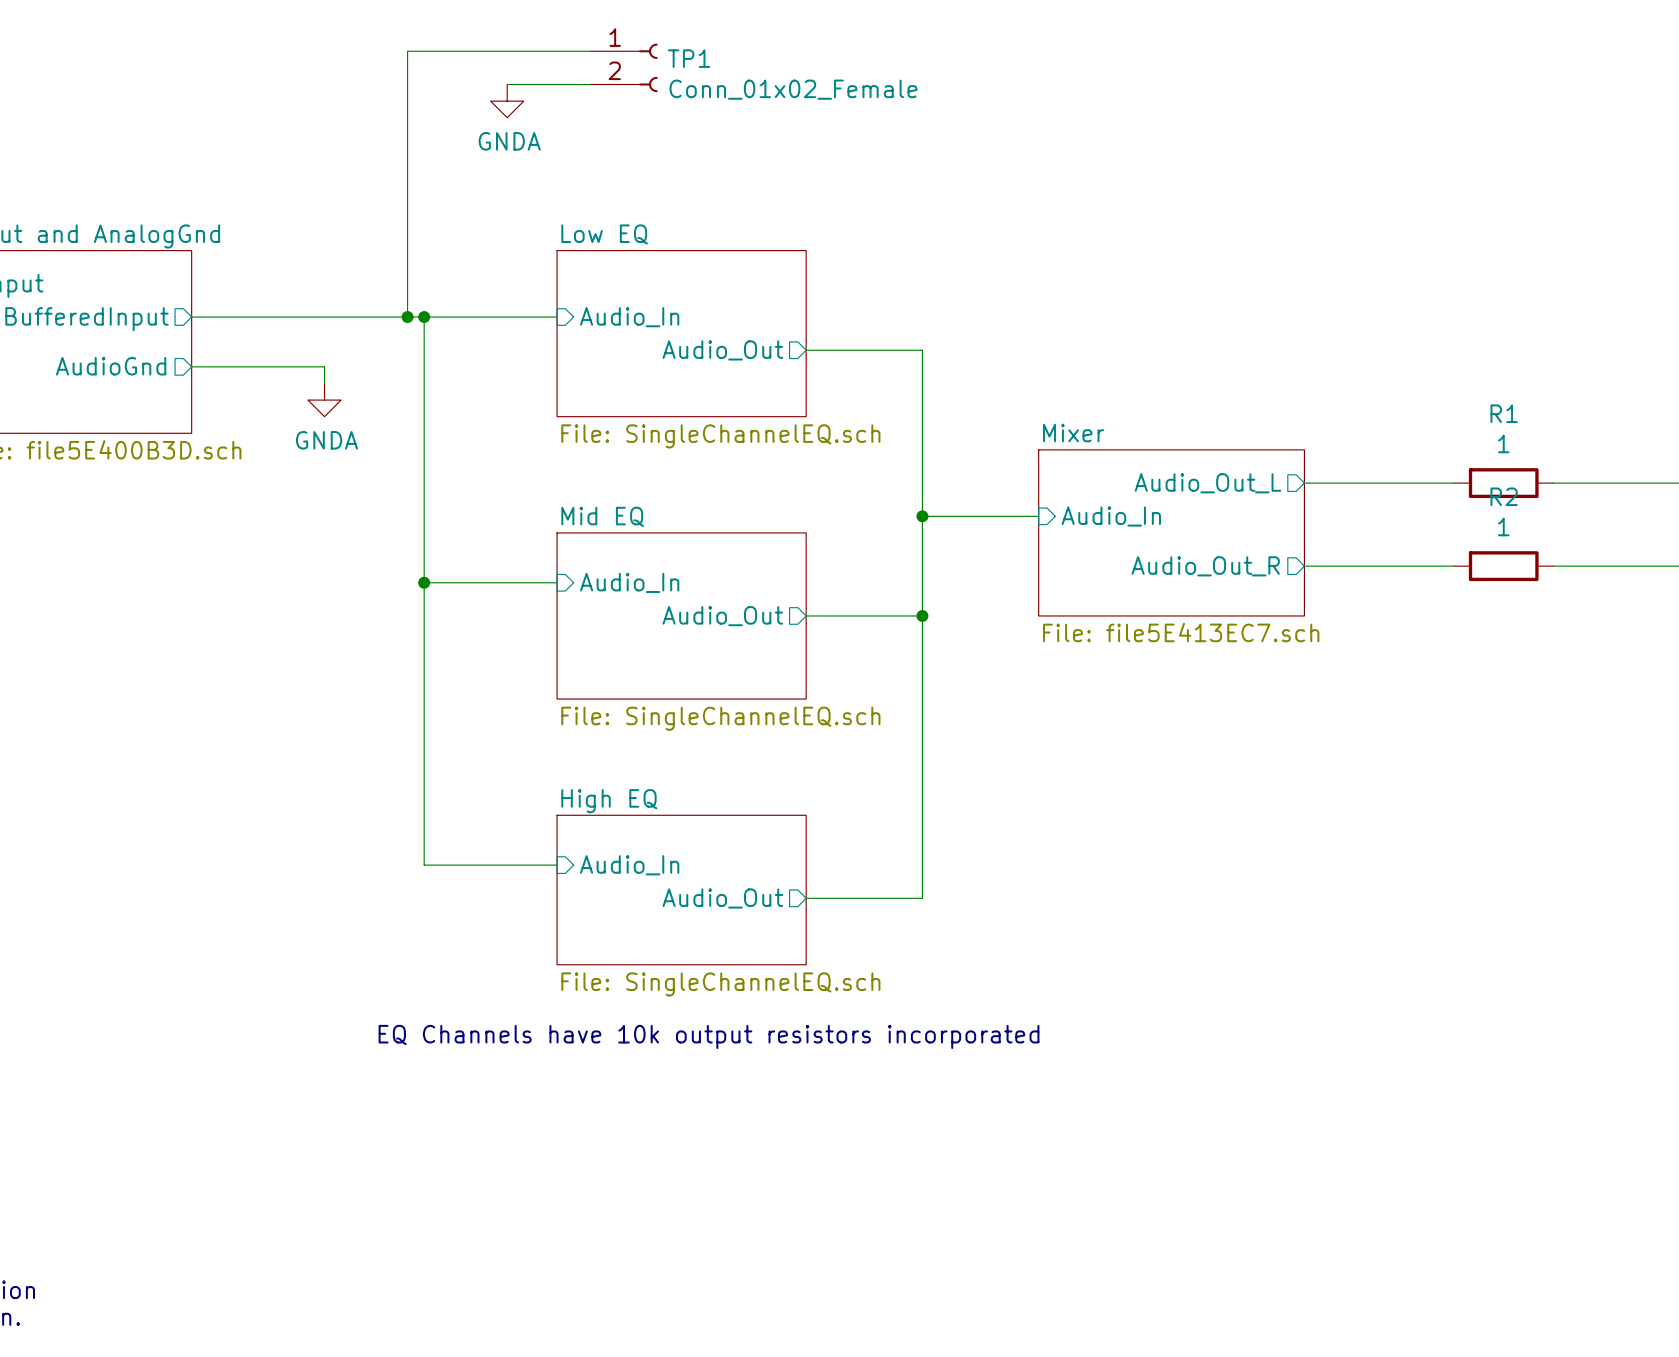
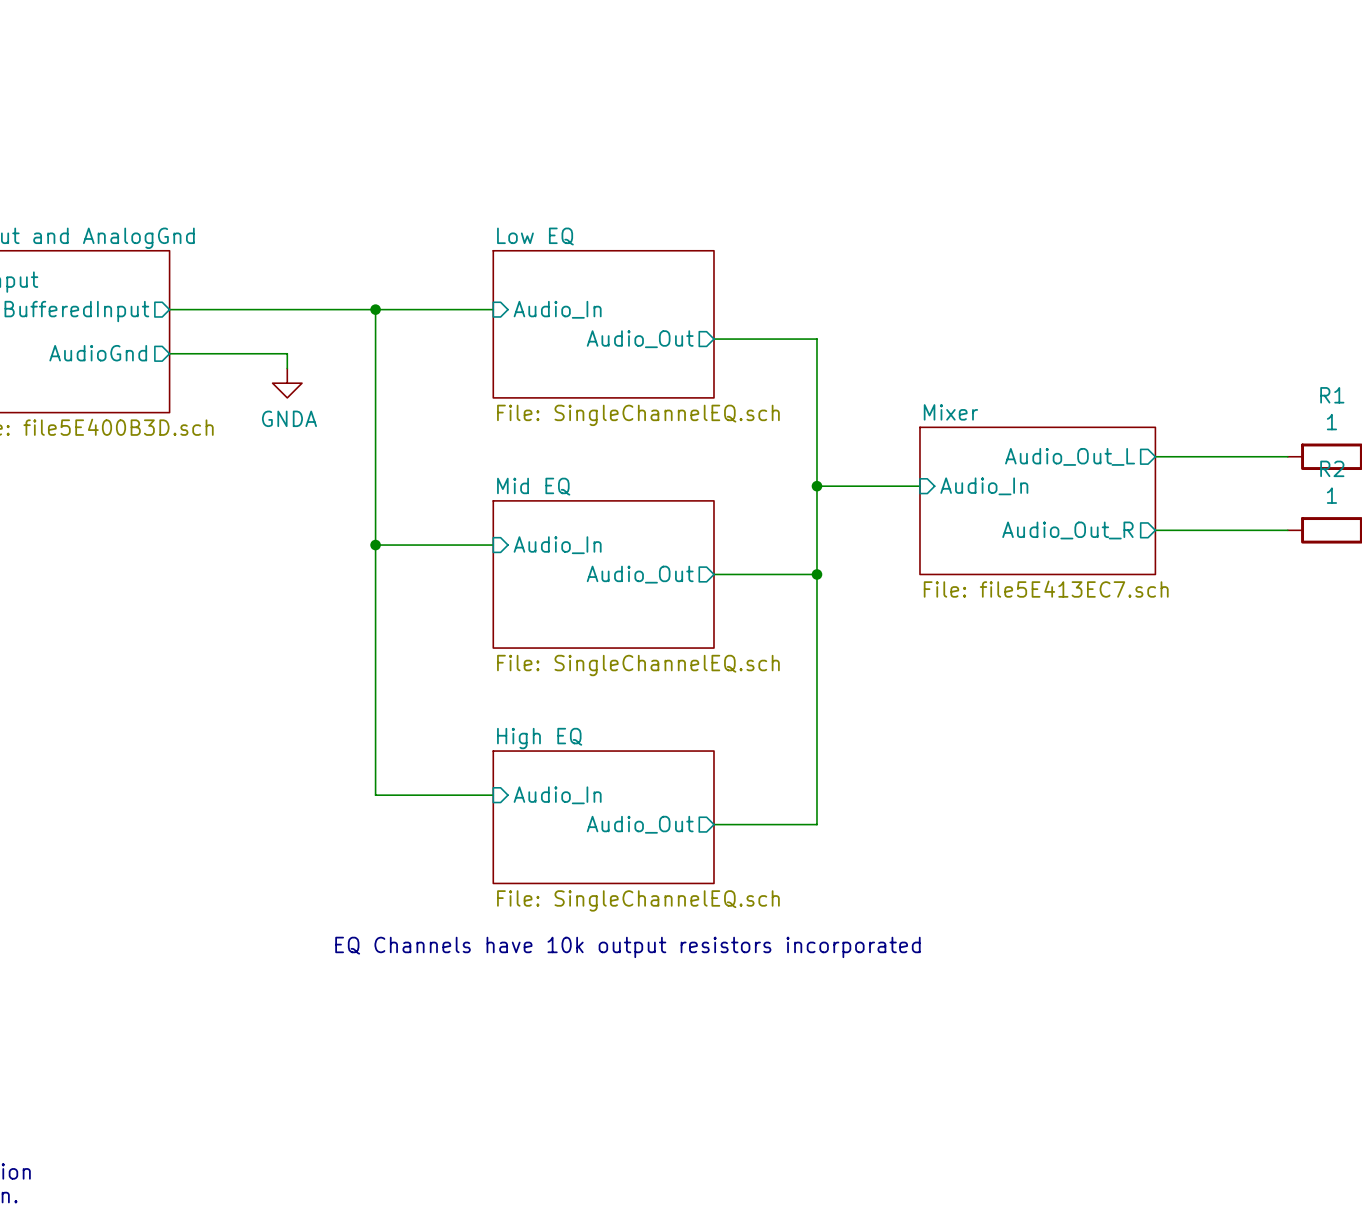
wire: (590, 51) (407, 51) (407, 317) -> none
TP1: Conn_01x02_Female (623, 67) -> none
wire: (507, 84) (590, 84) -> none
power symbol: GNDA (507, 101) -> none
junction: (407, 317) -> none

